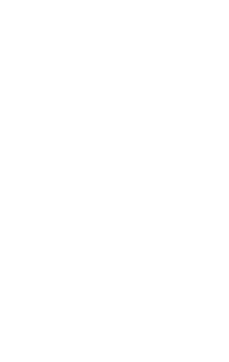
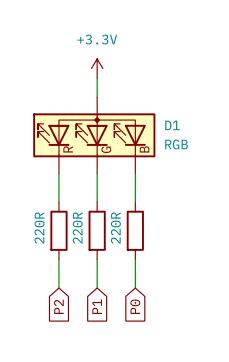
power symbol: none -> +3.3V (97, 68)
wire: none -> (97, 78) (97, 97)
D1: none -> RGB (94, 135)
wire: none -> (58, 173) (58, 202)
wire: none -> (97, 173) (97, 202)
wire: none -> (135, 173) (135, 202)
part: none -> 220R (58, 230)
part: none -> 220R (97, 230)
part: none -> 220R (135, 230)
wire: none -> (58, 259) (58, 288)
wire: none -> (97, 259) (97, 288)
wire: none -> (135, 259) (135, 288)
global label: none -> P2 (58, 306)
global label: none -> P1 (97, 306)
global label: none -> P0 (135, 306)

